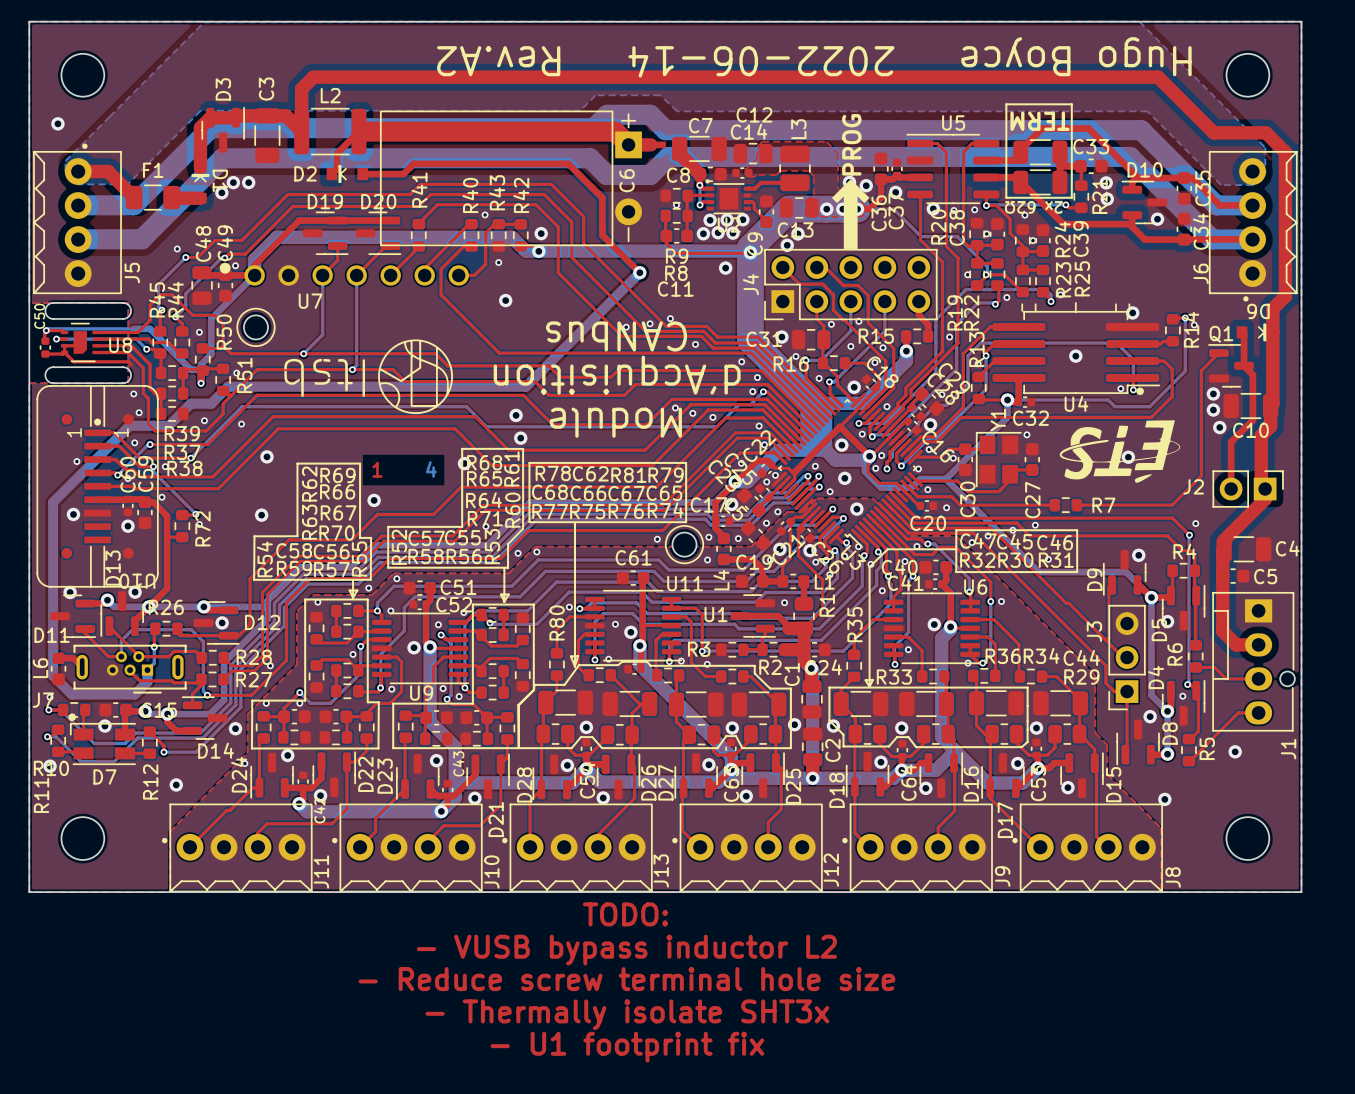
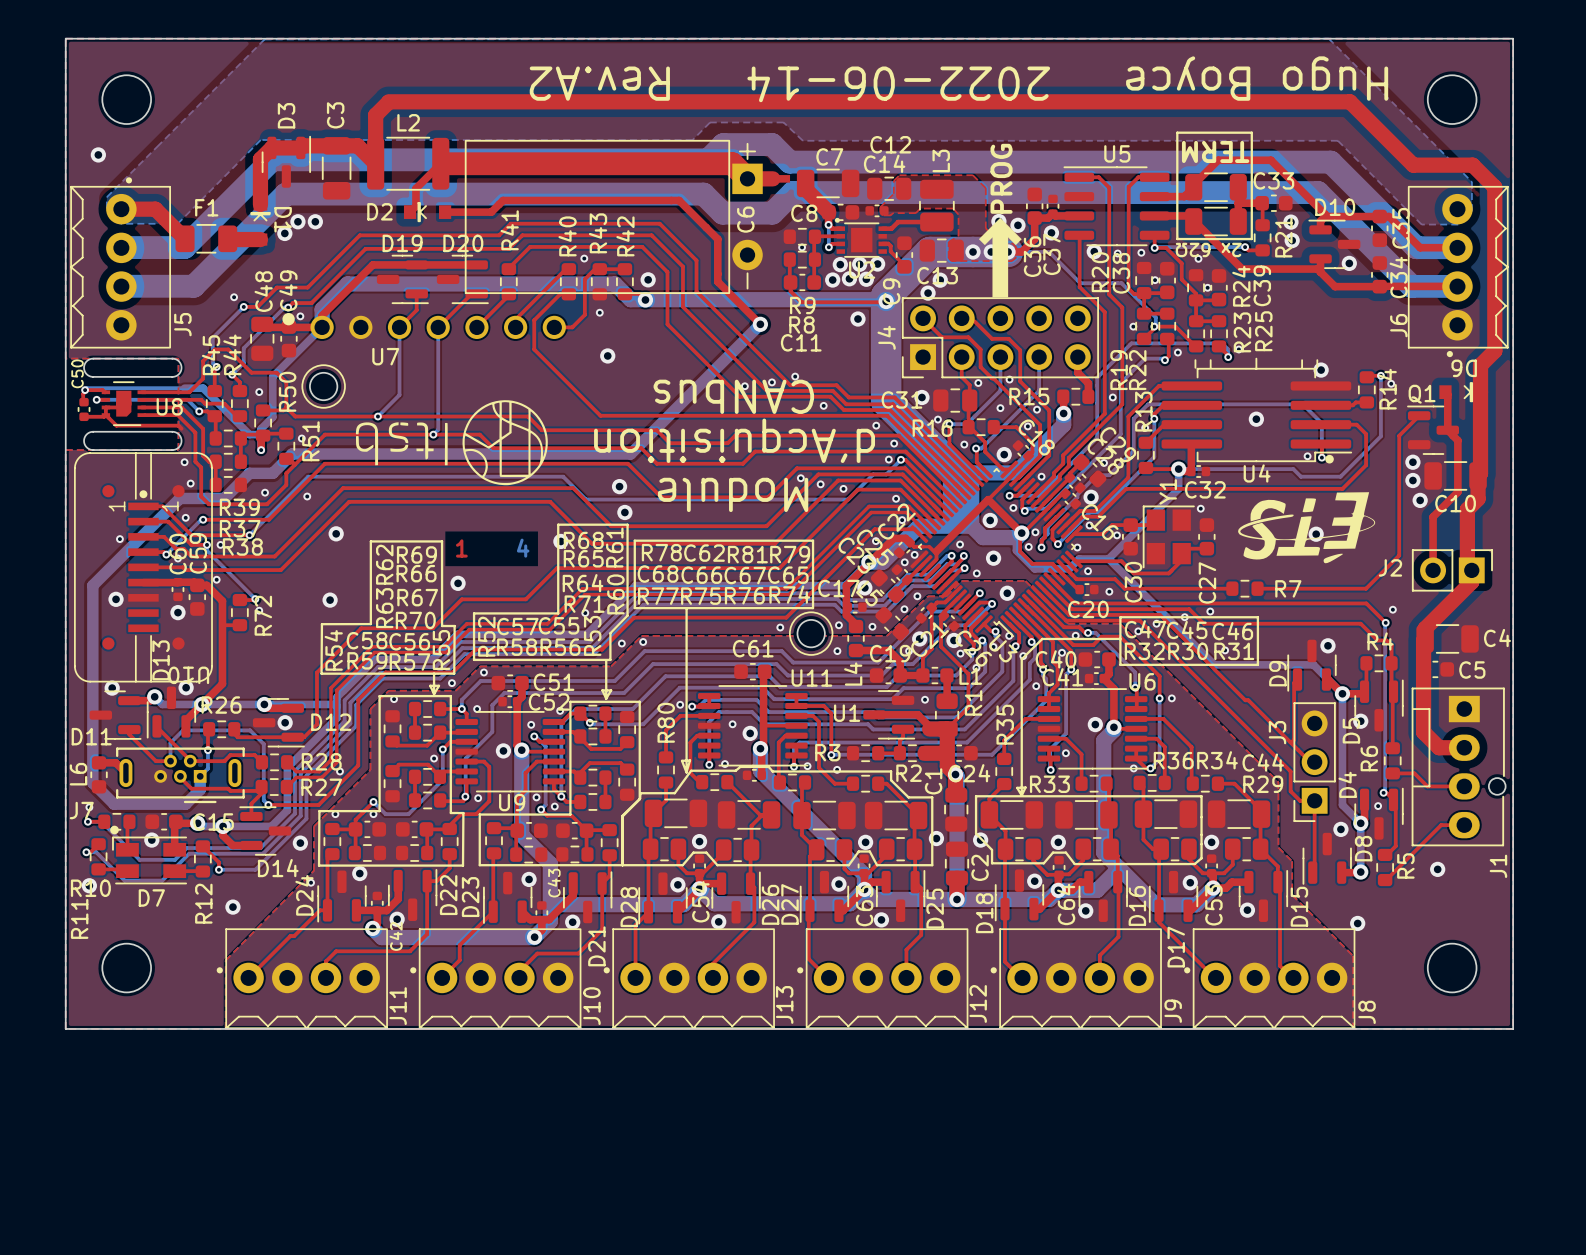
text: TODO: (625, 914) -> none
text: - VUSB bypass inductor L2 (626, 950) -> none
text: - Reduce screw terminal hole size (626, 979) -> none
text: - Thermally isolate SHT3x (627, 1014) -> none
text: - U1 footprint fix (627, 1047) -> none

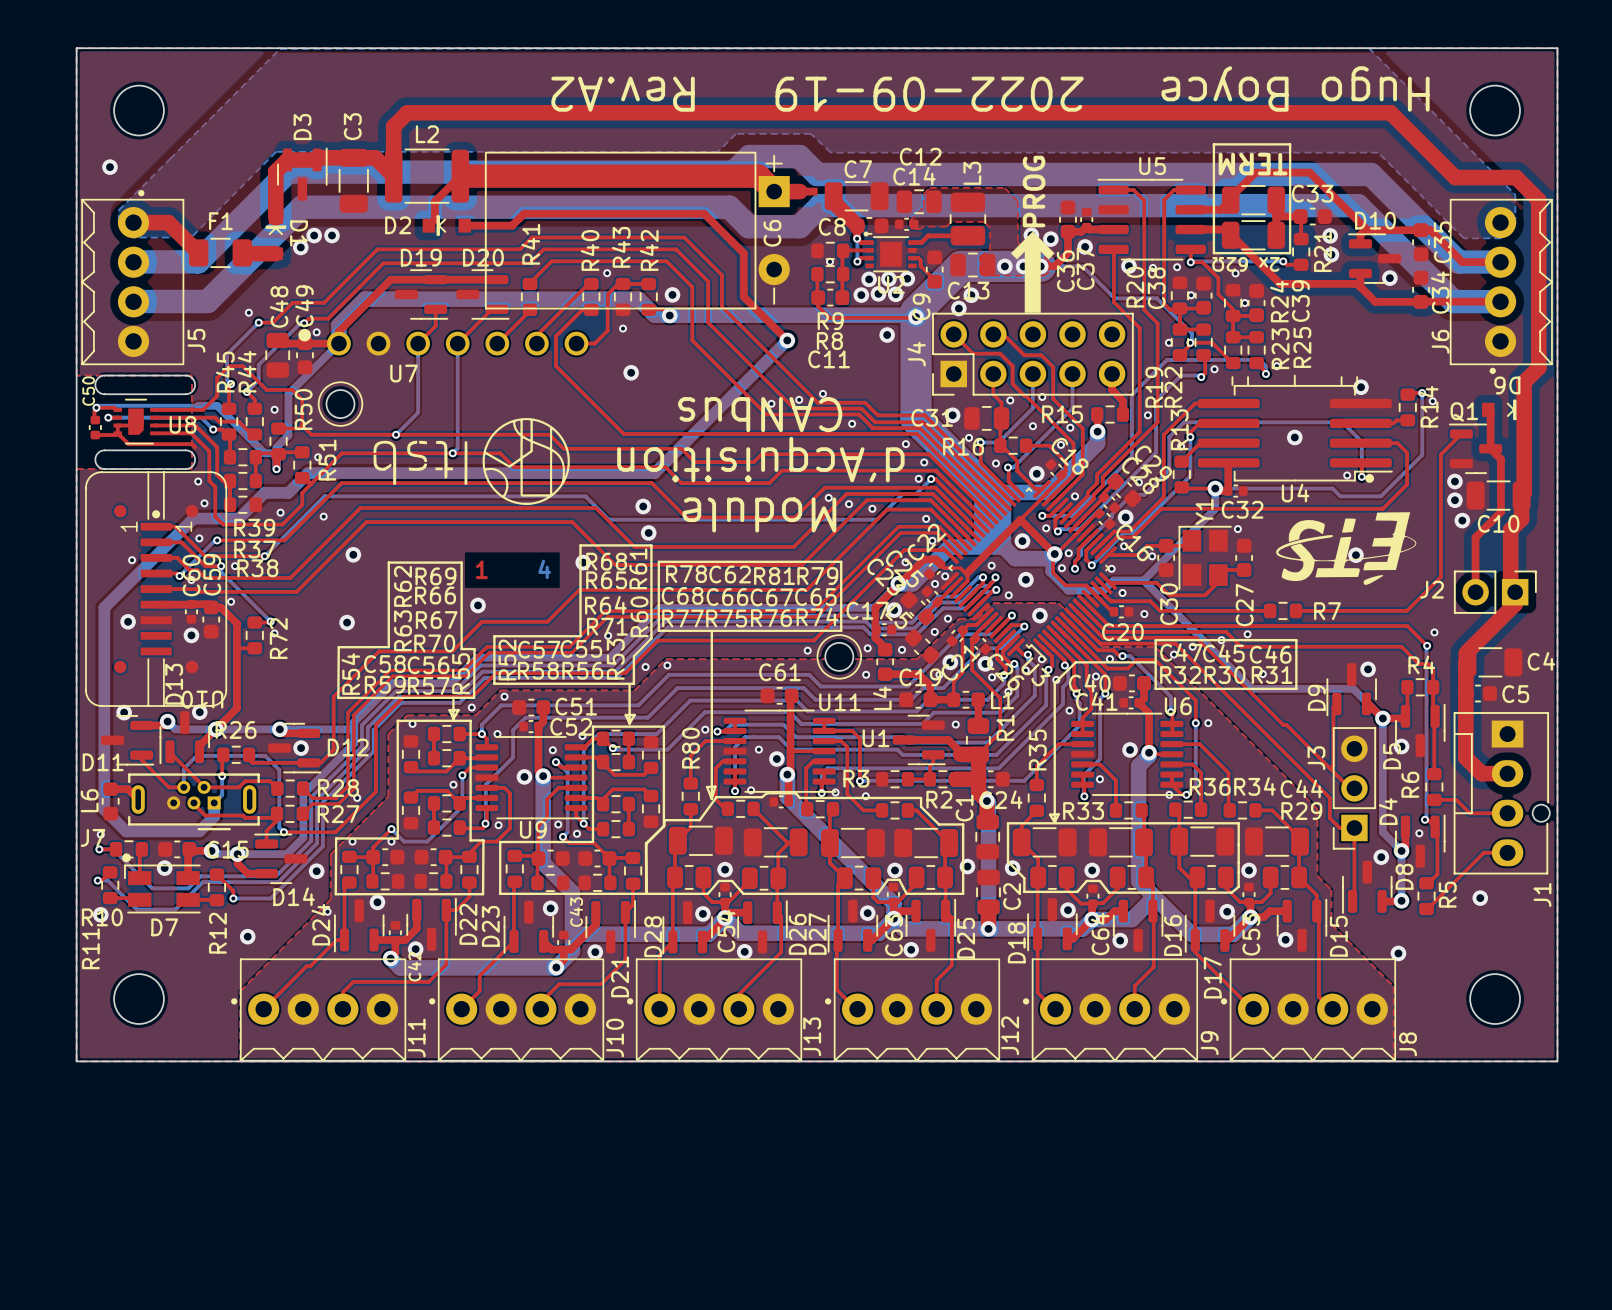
text: Hugo Boyce 2022-06-14 Rev.A2 (958, 79) -> Hugo Boyce 2022-09-19 Rev.A2 (990, 88)

